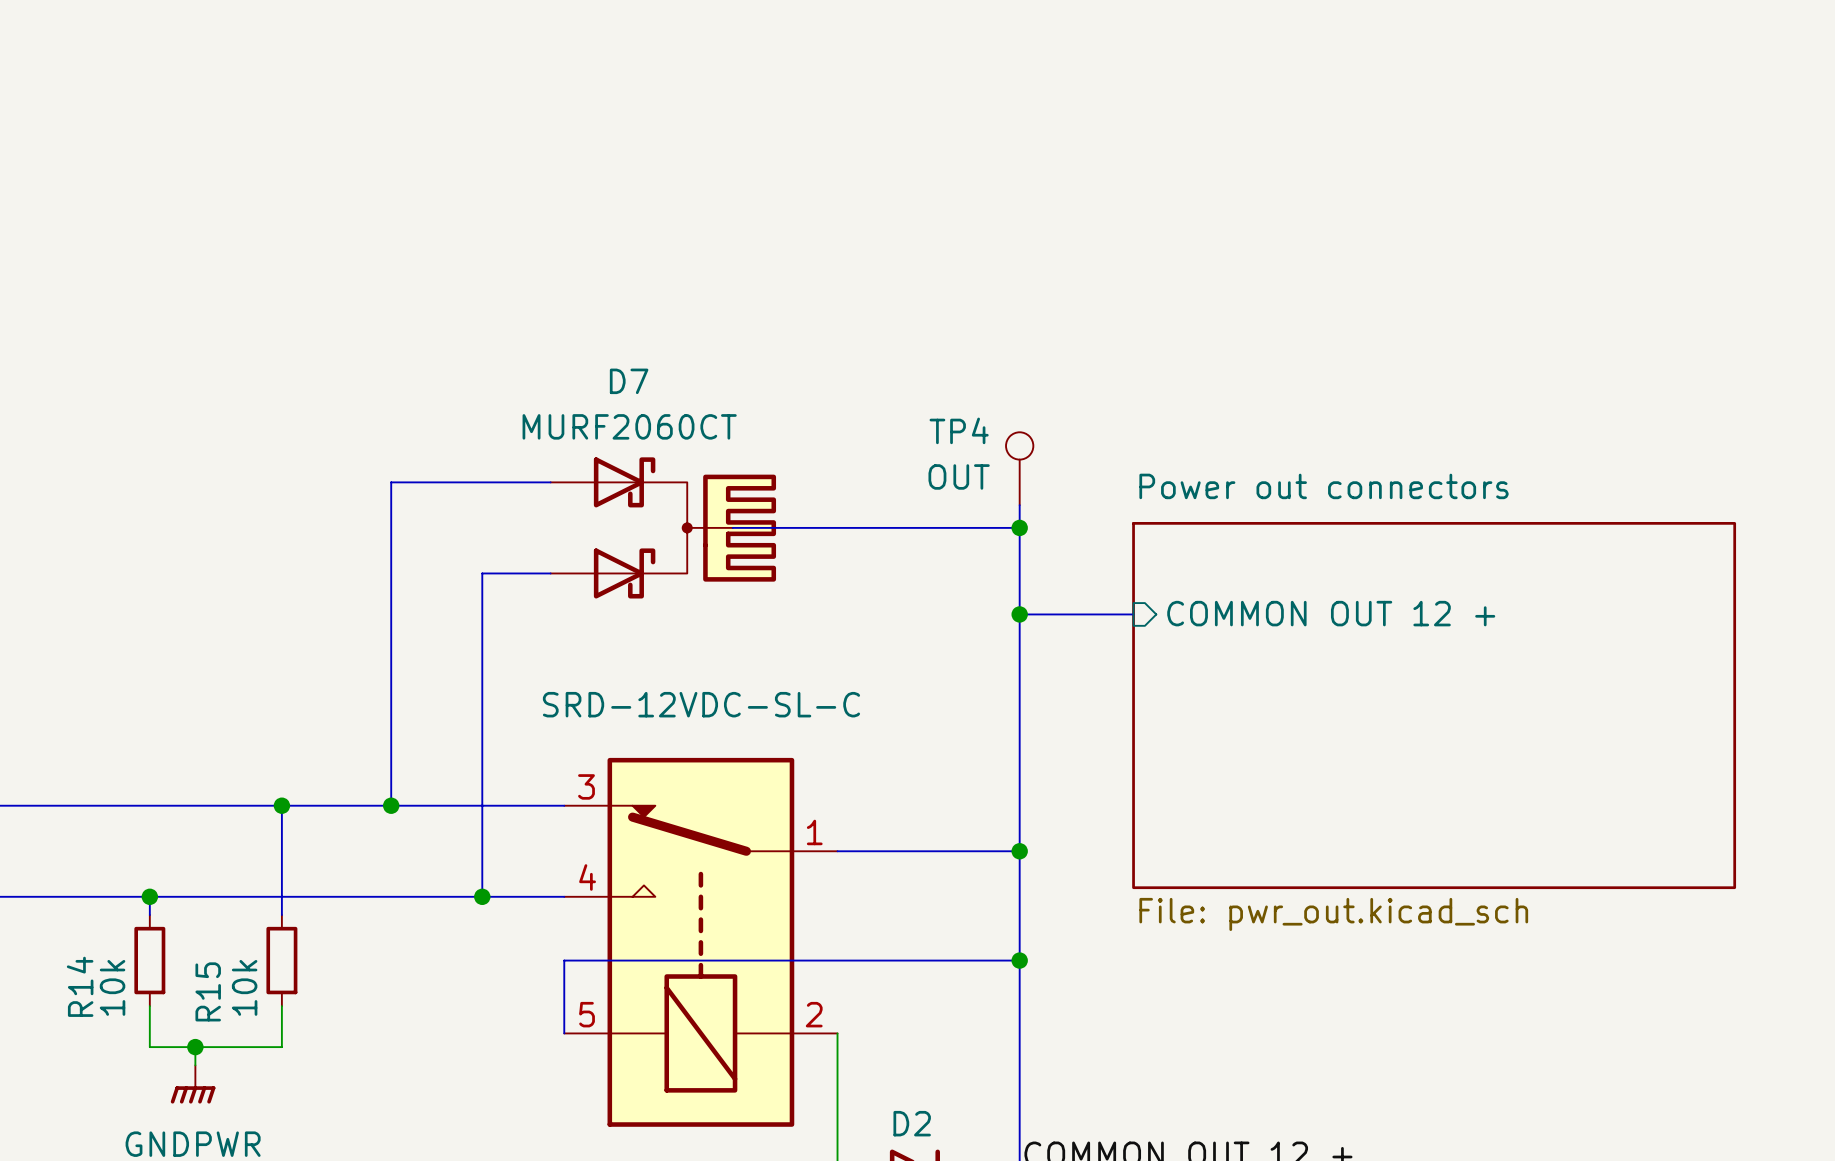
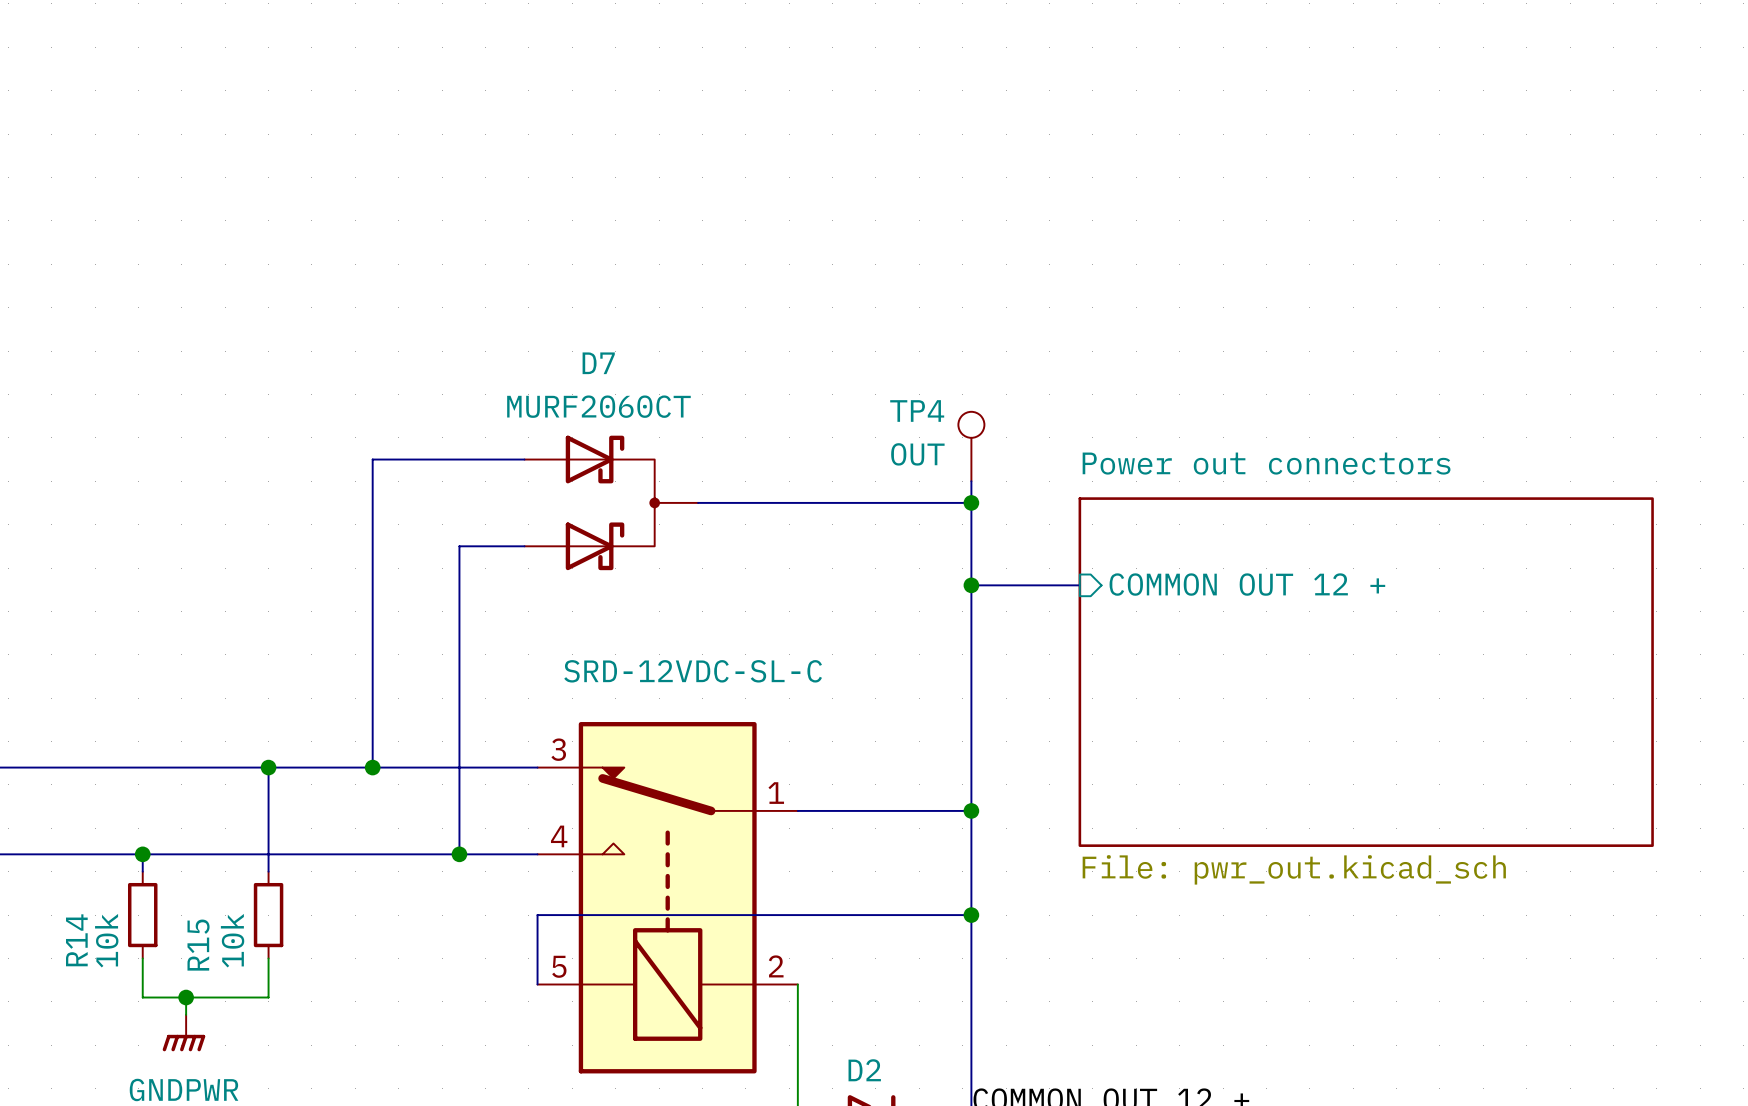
part: (739, 528) -> none

